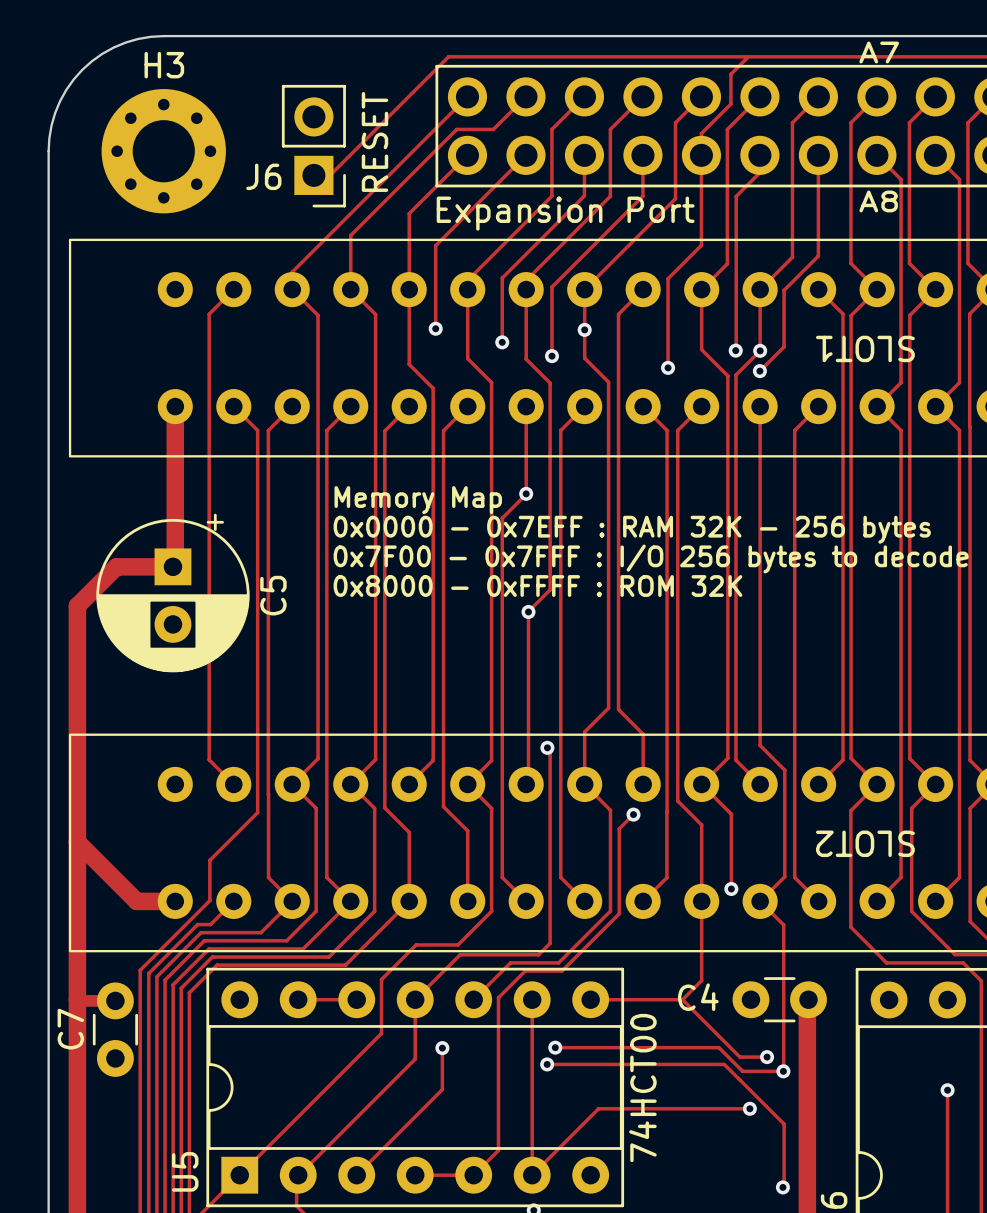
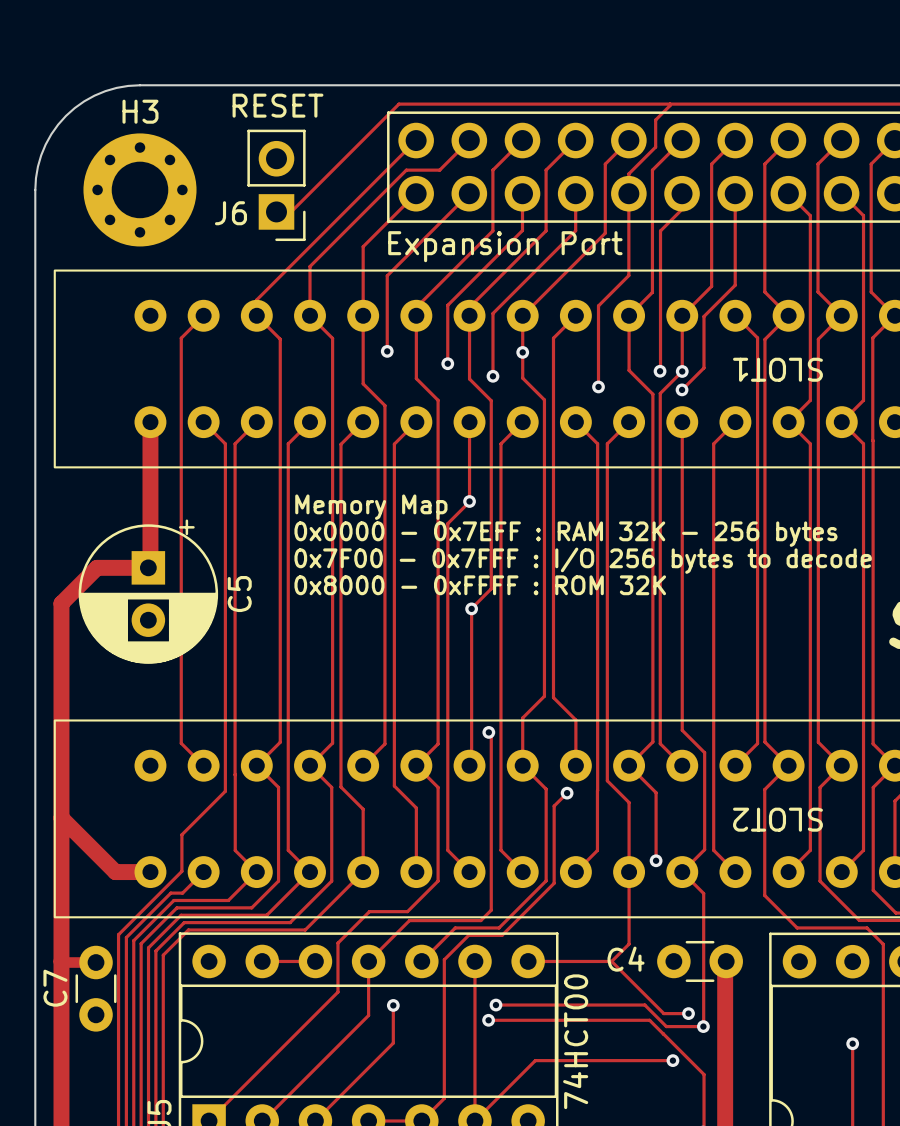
text: A7 (879, 52) -> none
J6 value rotation: 0° (374, 141) -> 90° clockwise (277, 105)
text: A8 (878, 201) -> none

